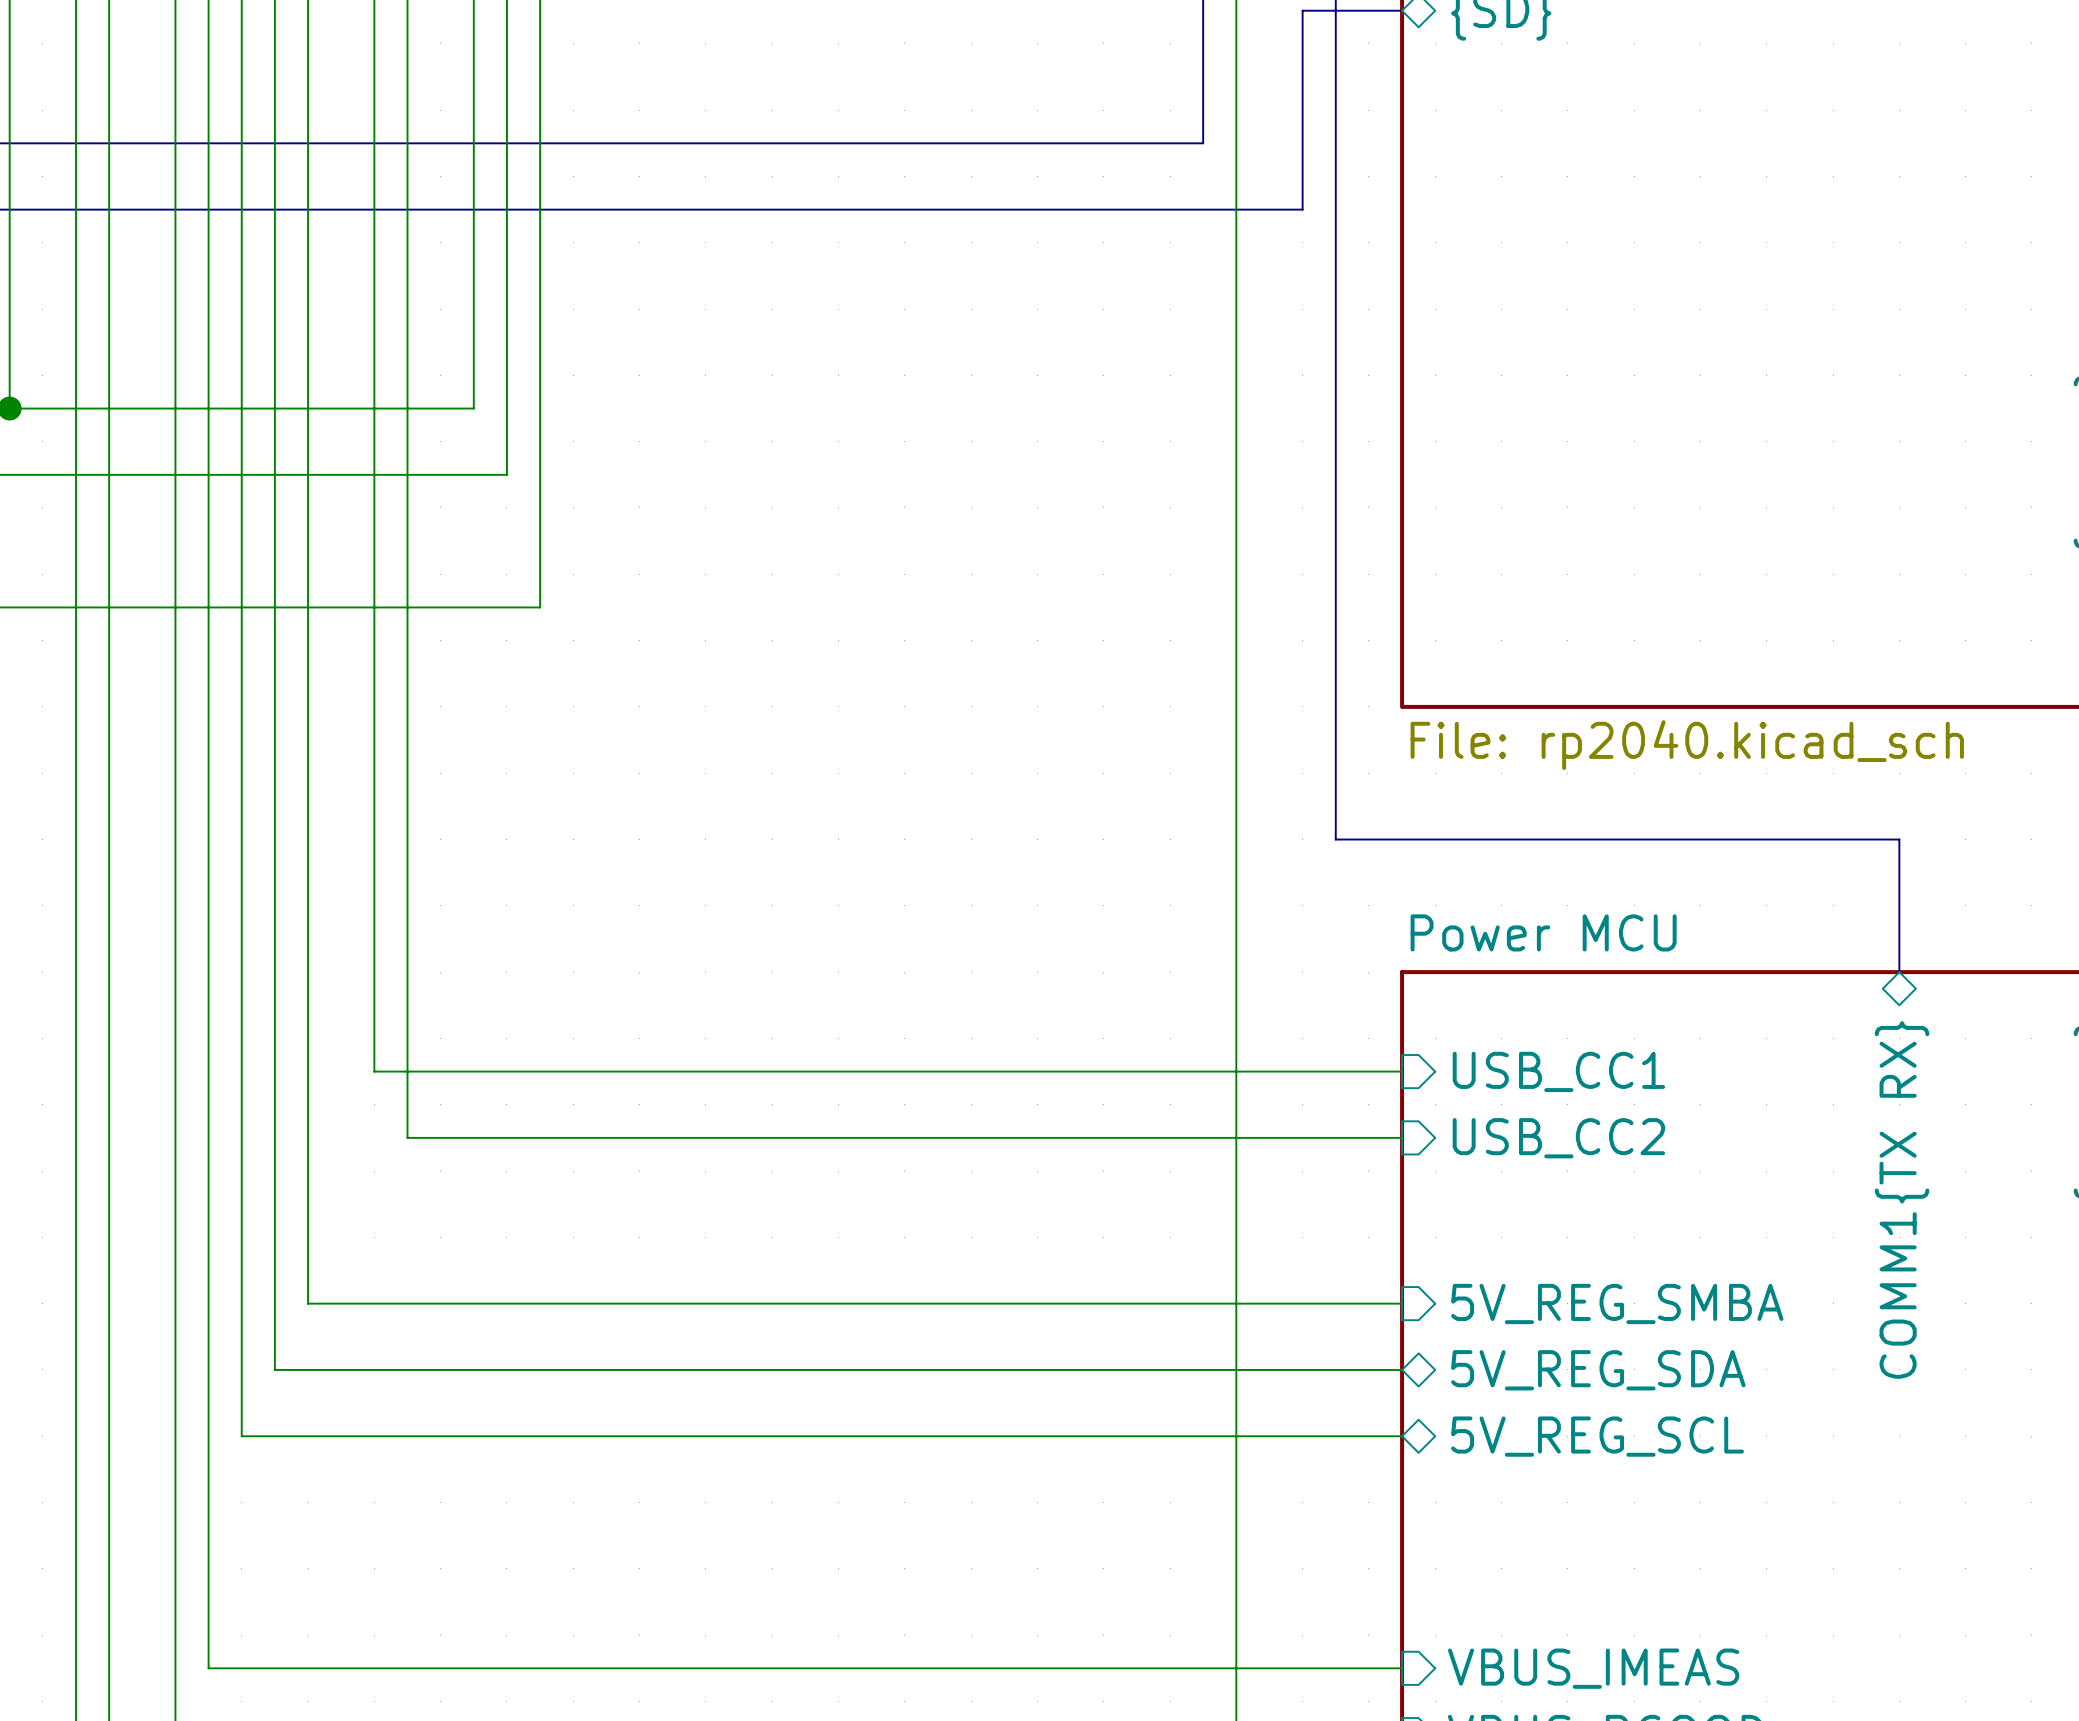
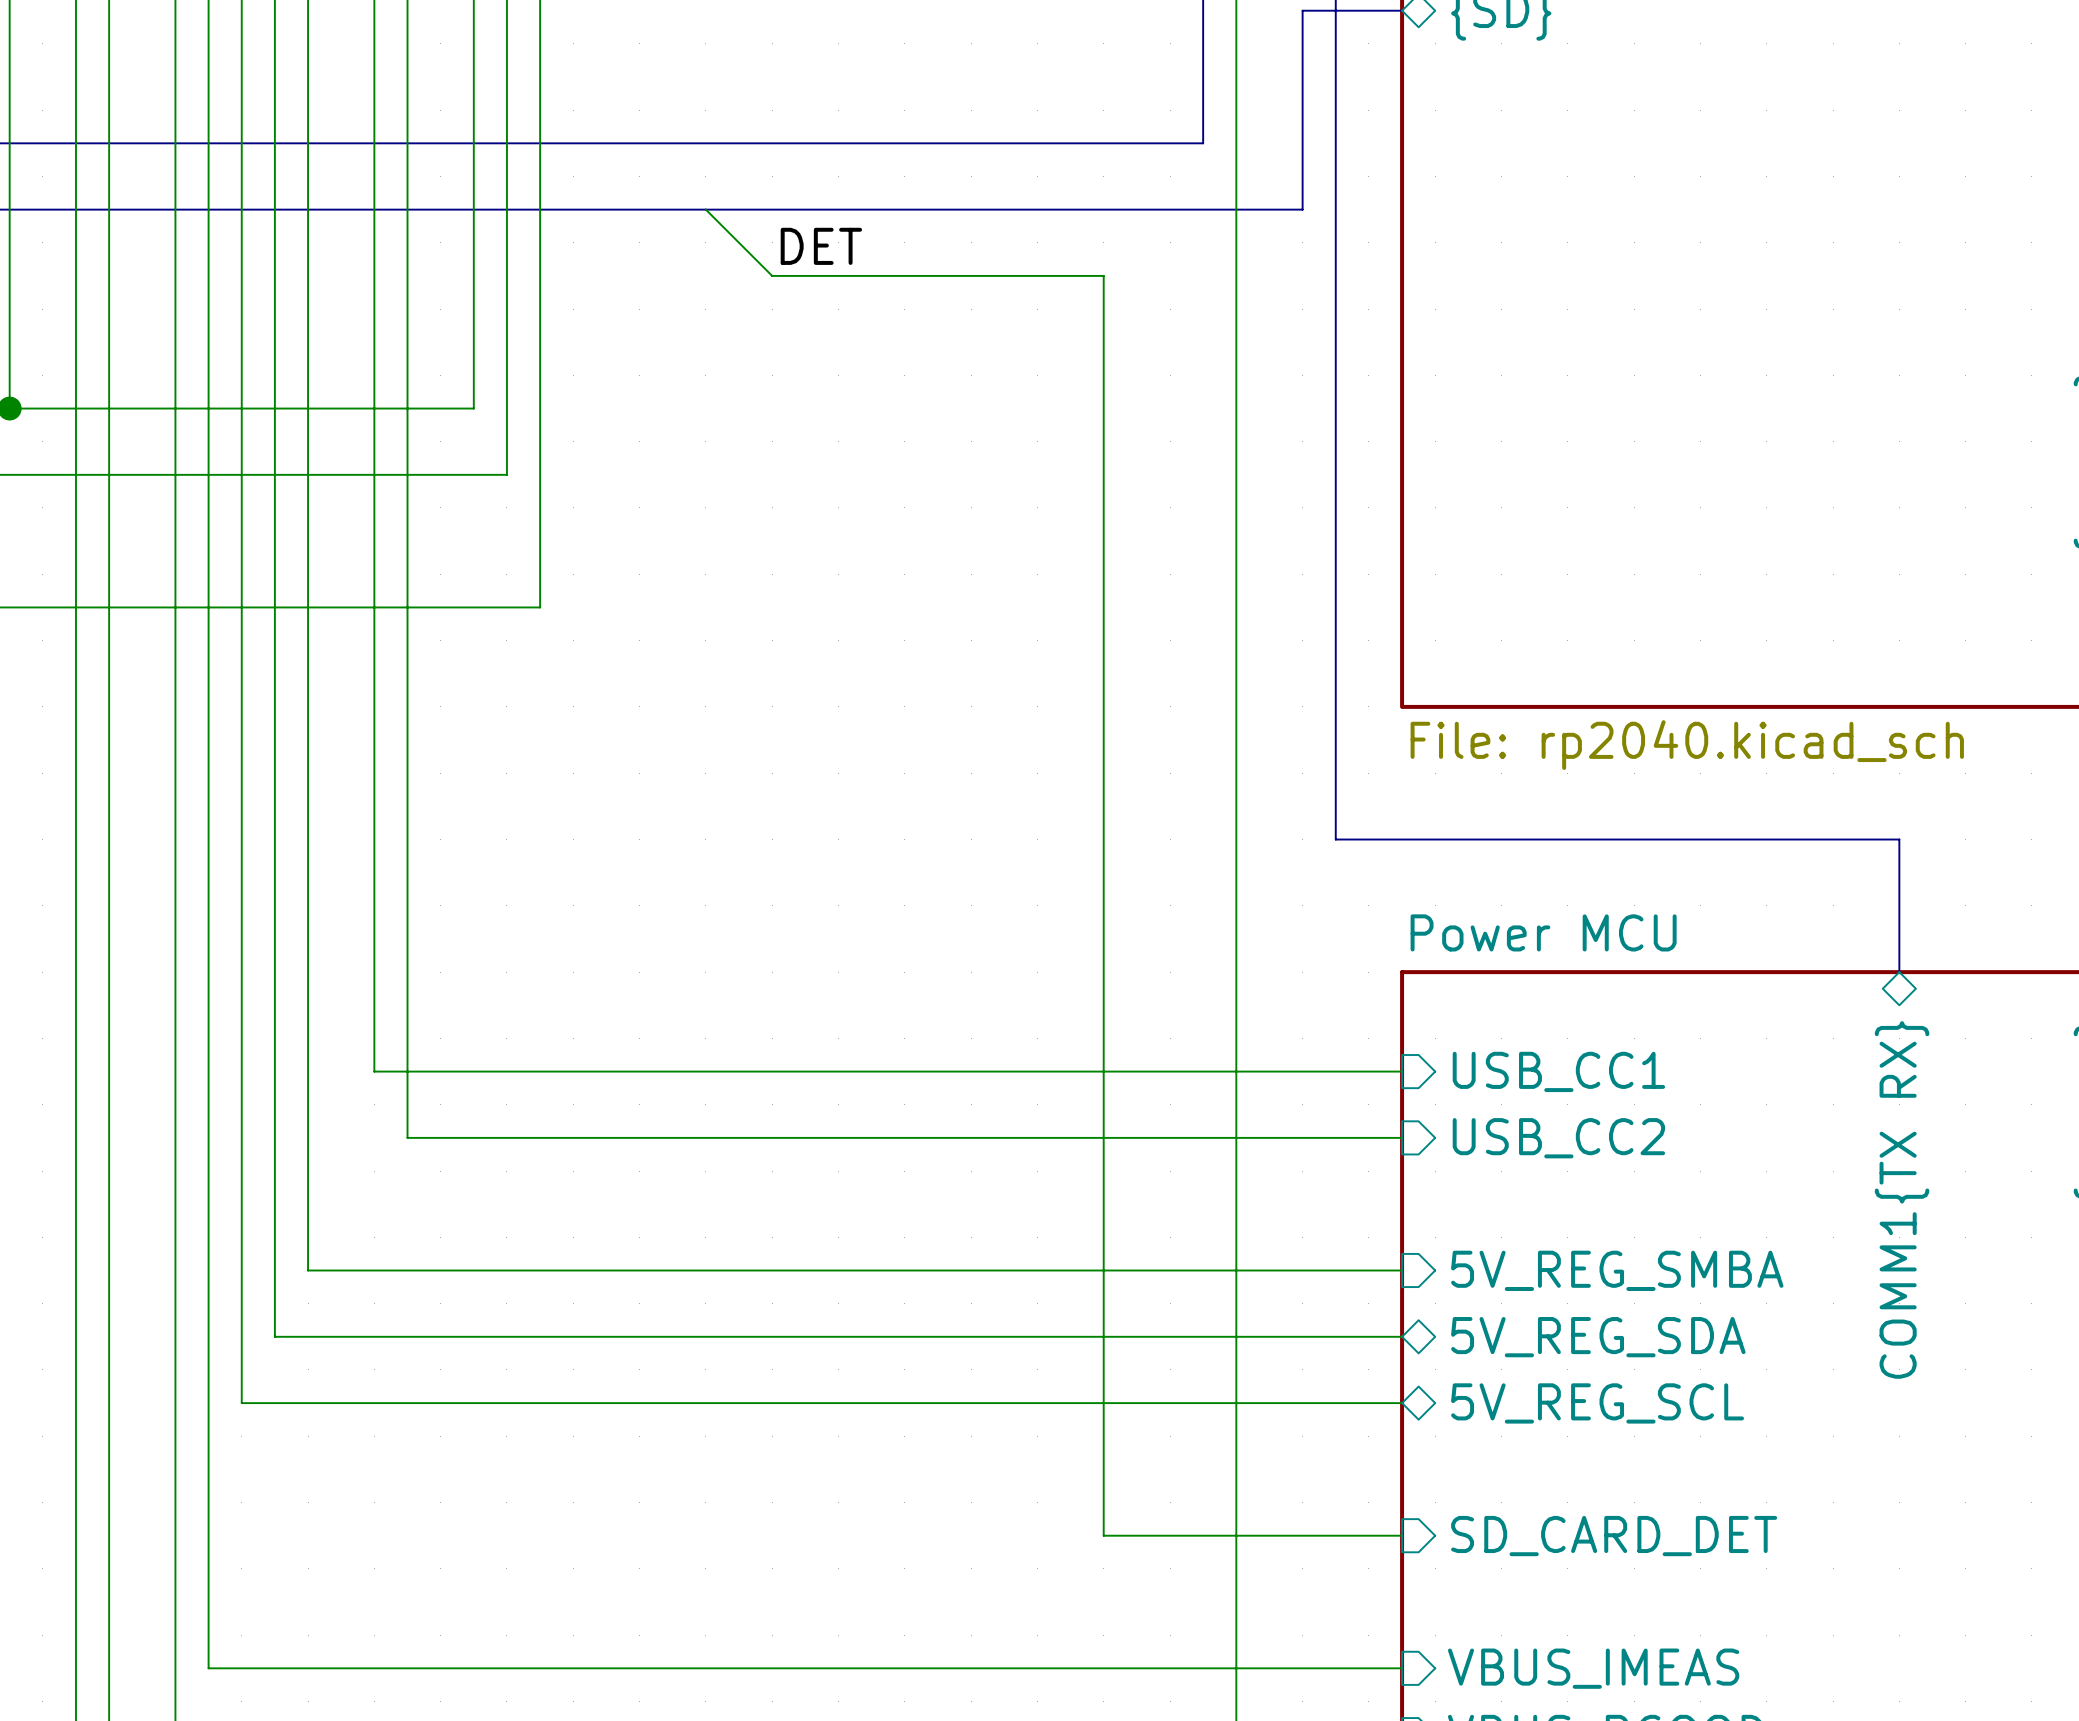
wire: none -> (705, 209) (772, 275) (1103, 275) (1103, 1535) (1402, 1535)
label: none -> DET (821, 246)
wire: (308, 1270) (308, 1303) (1402, 1303) -> (308, 1270) (1402, 1270)
sheet pin position: 5V_REG_SMBA (1617, 1303) -> 5V_REG_SMBA (1617, 1270)
wire: (274, 1336) (274, 1369) (1402, 1369) -> (274, 1336) (1402, 1336)
sheet pin position: 5V_REG_SDA (1598, 1370) -> 5V_REG_SDA (1598, 1337)
wire: (241, 1403) (241, 1436) (1402, 1436) -> (241, 1403) (1402, 1403)
sheet pin position: 5V_REG_SCL (1597, 1436) -> 5V_REG_SCL (1597, 1403)
sheet pin: none -> SD_CARD_DET (1614, 1536)

